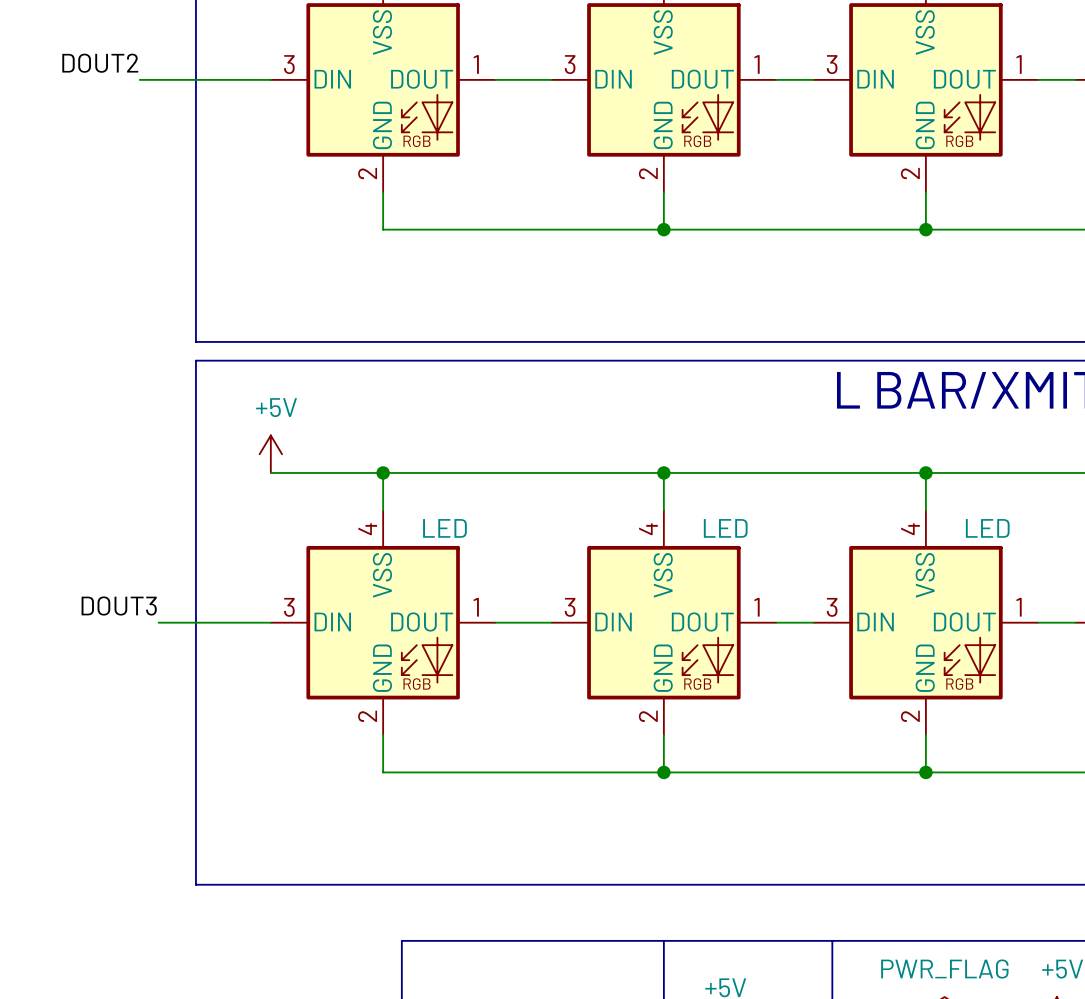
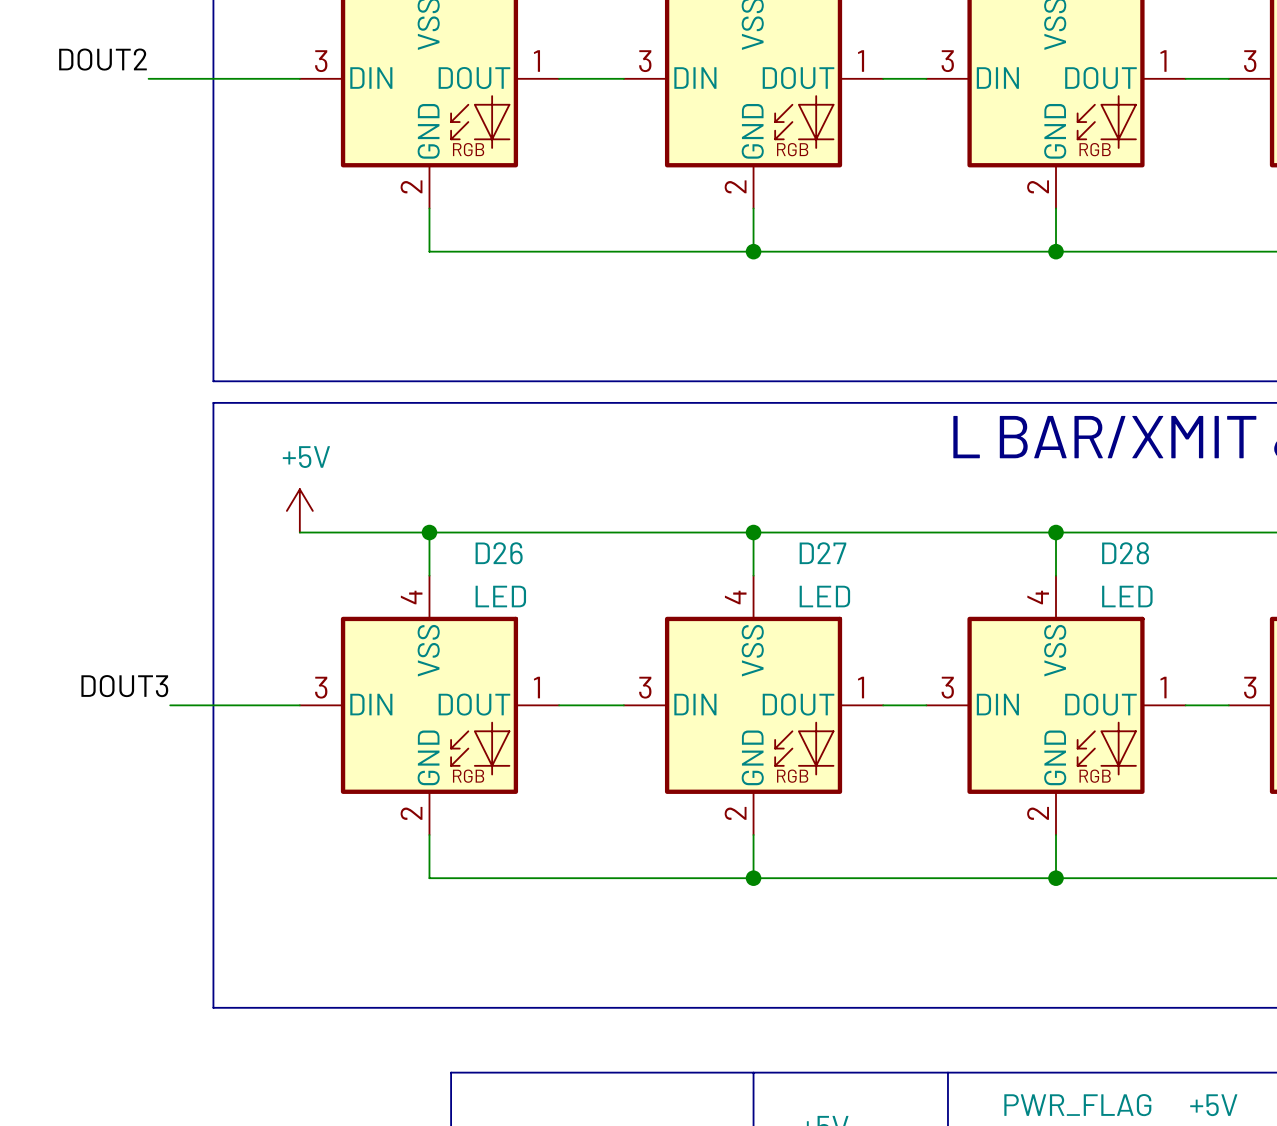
D26 name: none -> D26 (499, 553)
D27 name: none -> D27 (822, 553)
D28 name: none -> D28 (1125, 553)

